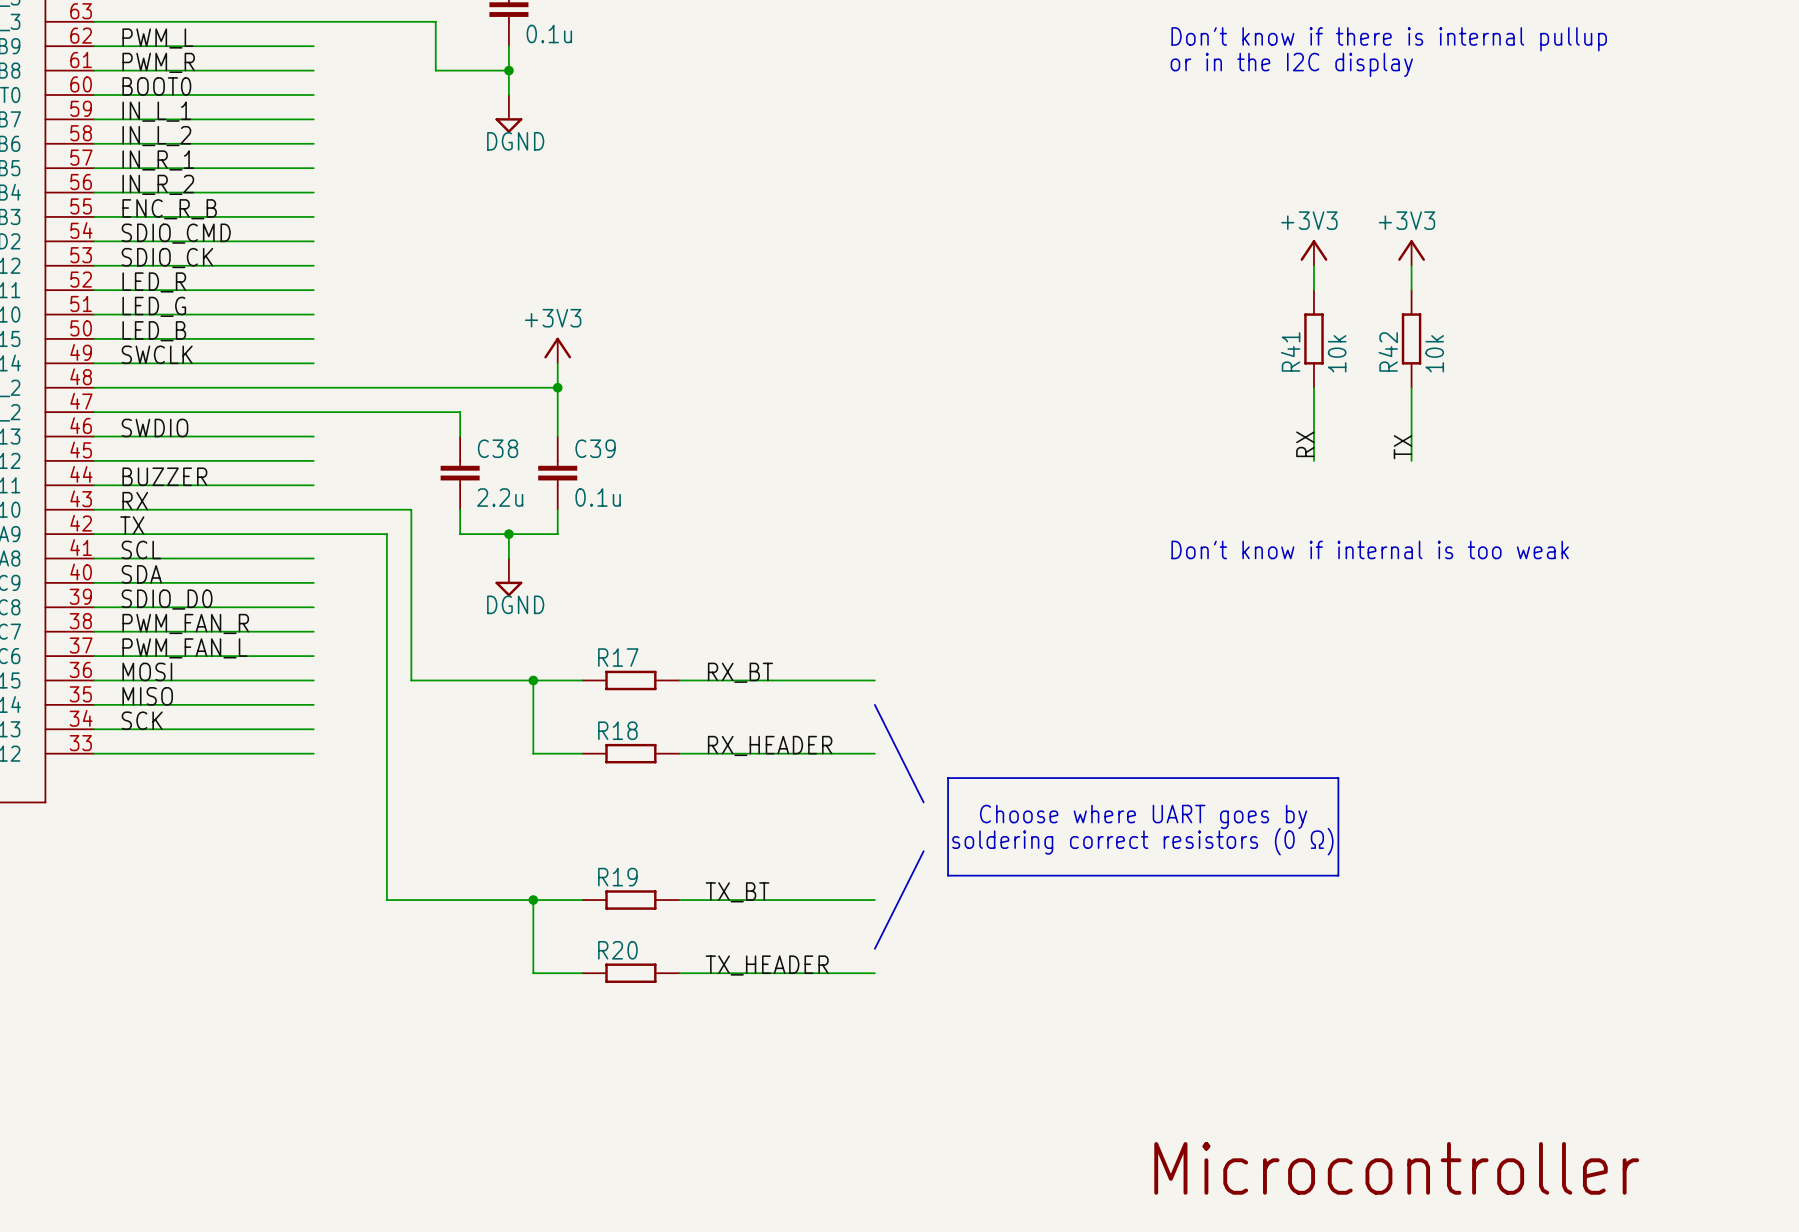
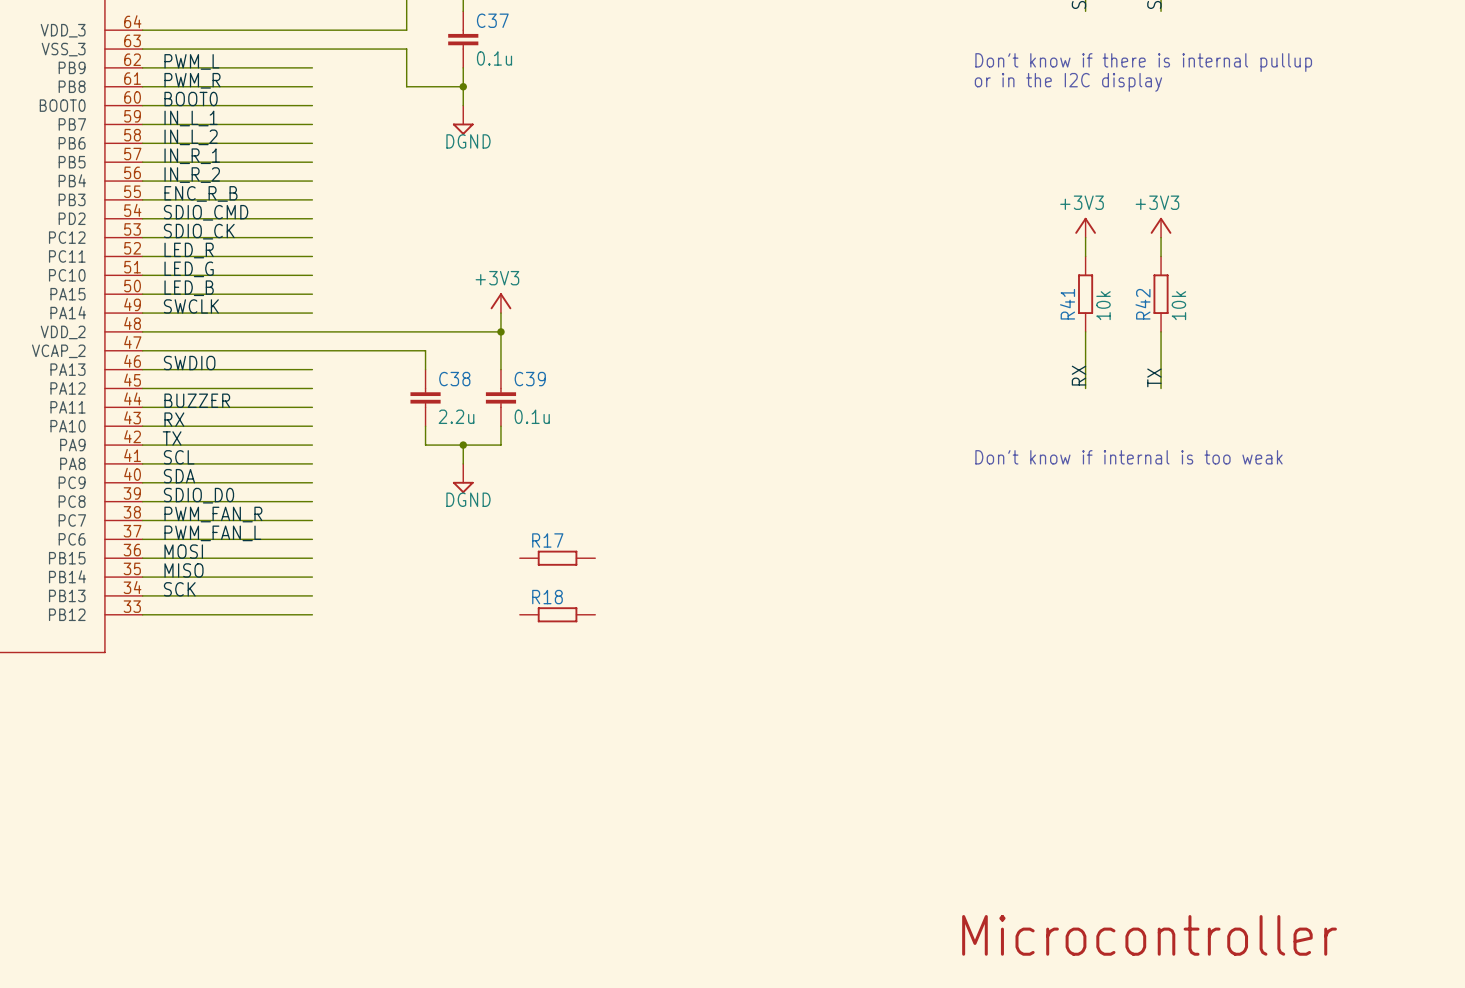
wire: (313, 509) (411, 509) (411, 680) (582, 680) -> none
wire: (313, 534) (386, 534) (386, 900) (582, 900) -> none
label: RX_BT (740, 672) -> none
wire: (533, 680) (533, 753) (582, 753) -> none
junction: (533, 680) -> none
wire: (679, 680) (874, 680) -> none
line: (874, 704) (923, 802) -> none
label: RX_HEADER (770, 745) -> none
wire: (679, 753) (874, 753) -> none
line: (948, 778) (948, 875) (1338, 875) (1338, 778) (948, 778) -> none
text: Choose where UART goes by (1143, 816) -> none
text: soldering correct resistors (0 Ω) (1142, 841) -> none
line: (923, 851) (874, 948) -> none
label: TX_BT (737, 892) -> none
wire: (533, 900) (533, 973) (582, 973) -> none
junction: (533, 900) -> none
R19: (630, 900) -> none
wire: (679, 900) (874, 900) -> none
label: TX_HEADER (767, 965) -> none
R20: (630, 973) -> none
wire: (679, 973) (874, 973) -> none

